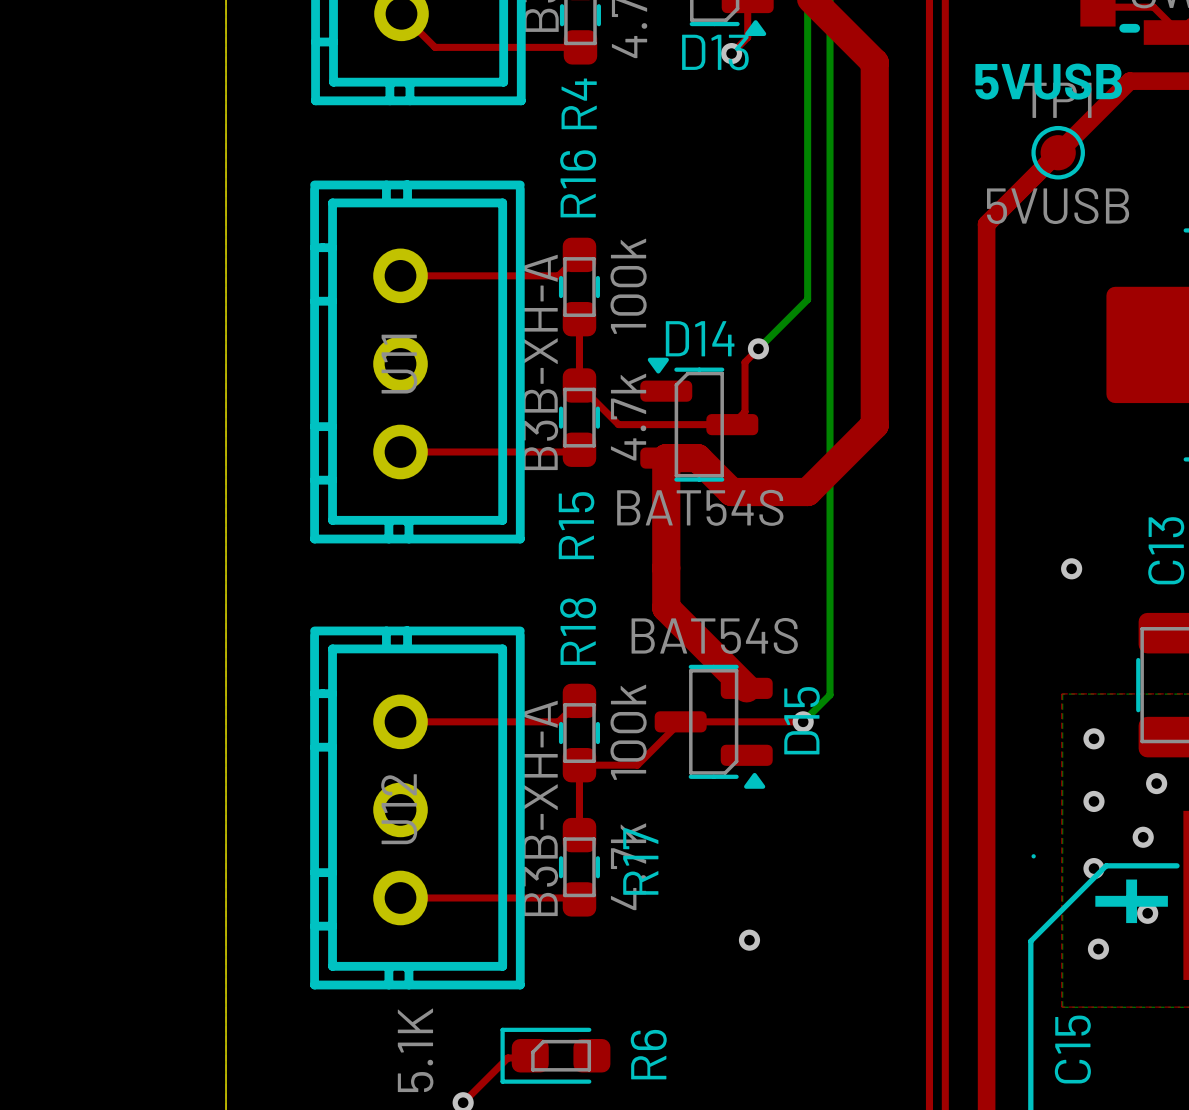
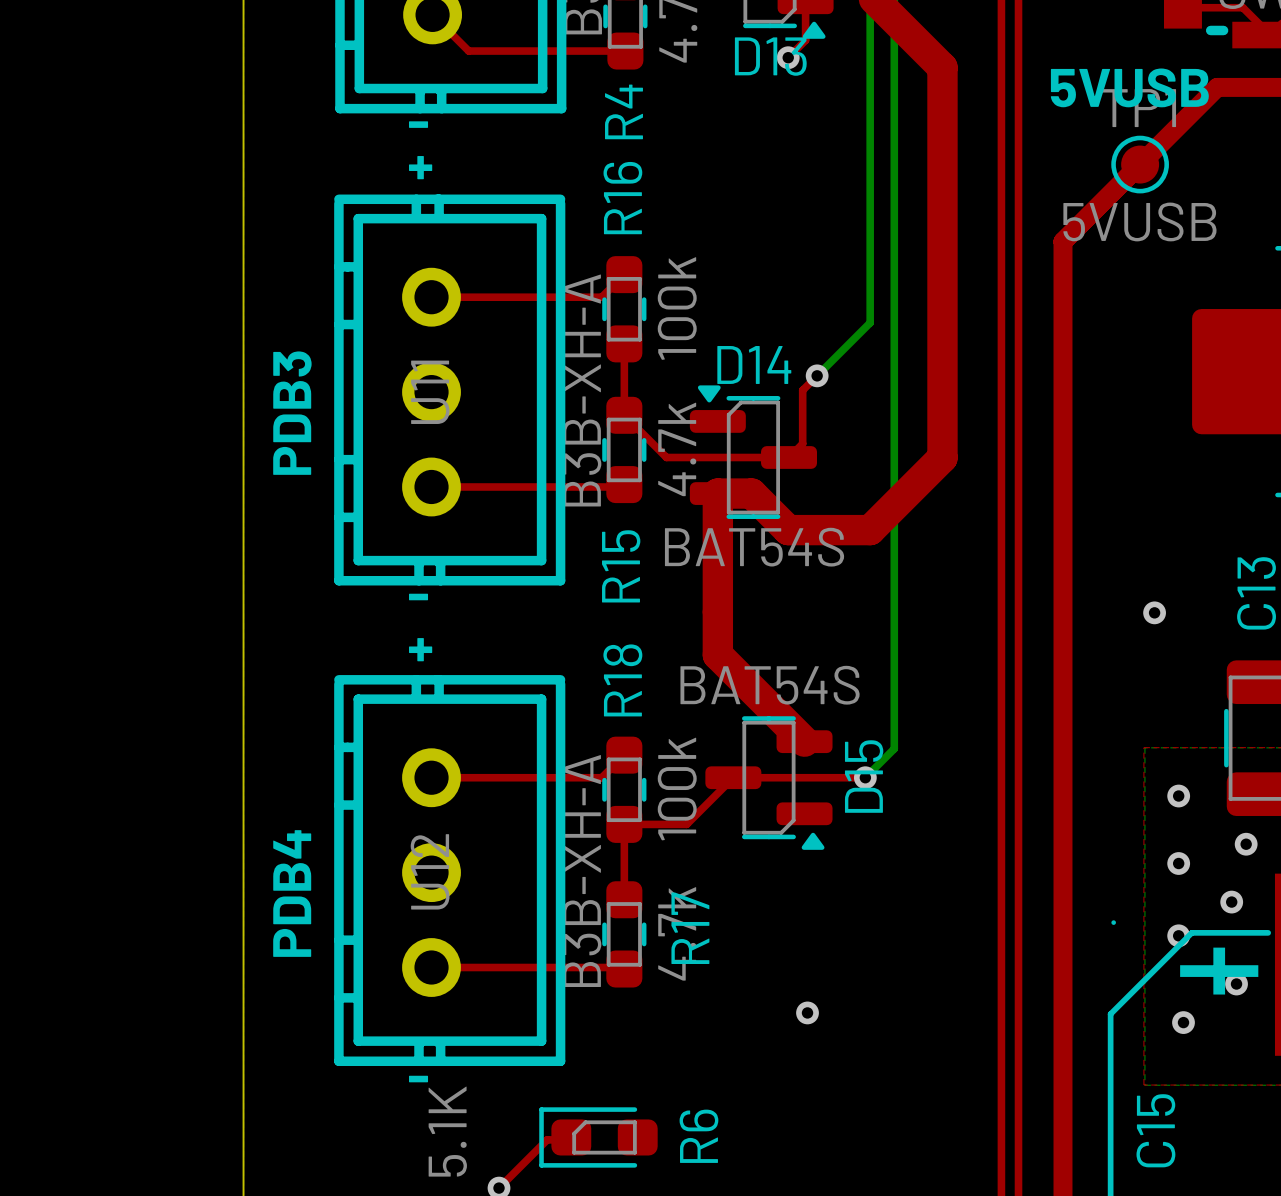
text: none -> - (418, 124)
text: none -> + (420, 167)
text: none -> PDB3 (292, 413)
text: none -> - (418, 597)
text: none -> + (420, 649)
text: none -> PDB4 (292, 893)
text: none -> - (418, 1079)

